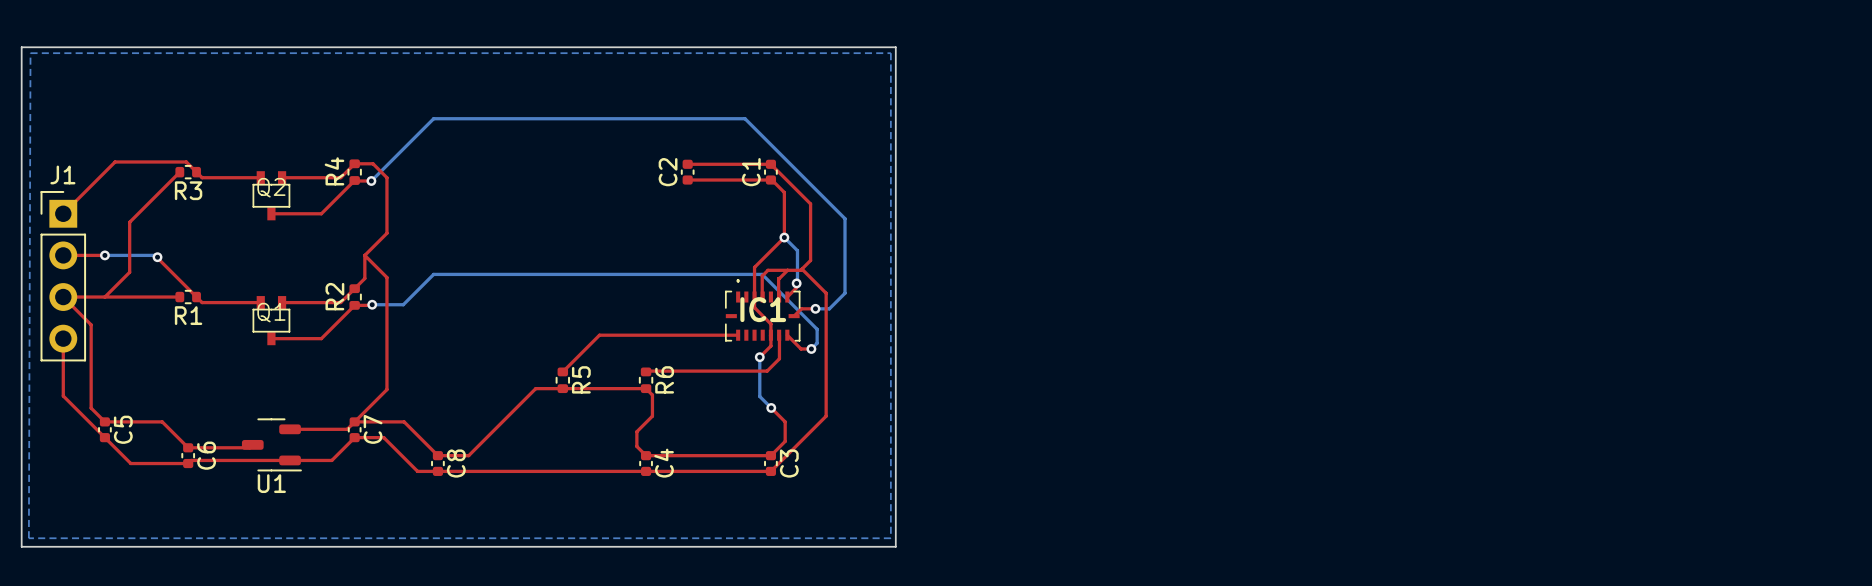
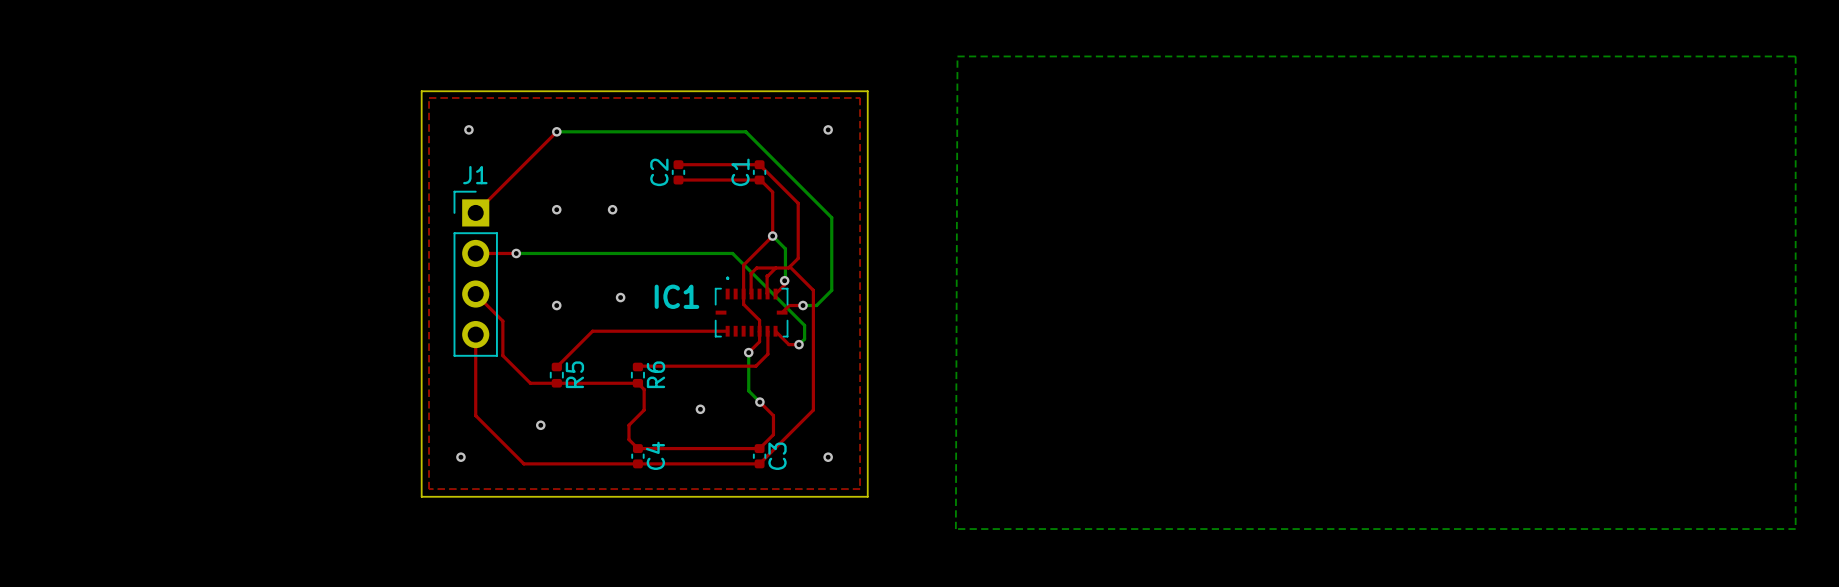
board edge: (21, 47) (21, 546) (895, 546) (895, 47) (21, 47) -> none
bottom zone outline: (30, 53) (28, 538) (890, 538) (890, 53) (30, 53) -> none
bottom zone outline: none -> (957, 56) (955, 529) (1795, 529) (1795, 56) (957, 56)
board edge: none -> (421, 91) (421, 496) (867, 496) (867, 91) (421, 91)
top zone outline: none -> (429, 97) (429, 489) (860, 489) (860, 97) (429, 97)
via: none -> (468, 129)
via: none -> (828, 129)
top track: none -> (556, 131) (475, 212)
via: none -> (556, 131)
bottom track: (756, 130) (745, 118) (433, 118) (371, 181) -> (745, 131) (556, 131)
top track: (179, 172) (129, 222) (129, 272) (104, 297) -> none
R3: (188, 172) -> none
R4: (354, 172) -> none
top track: (260, 177) (202, 177) (186, 161) (115, 161) (63, 213) -> none
top track: (282, 177) (340, 177) (354, 163) (373, 163) (386, 177) (386, 233) (364, 255) -> none
top track: (371, 181) (354, 180) (321, 213) (271, 213) -> none
via: (371, 181) -> none
Q2: (271, 195) -> none
via: none -> (556, 209)
via: none -> (612, 209)
top track: (63, 255) (104, 255) -> none
bottom track: (104, 255) (155, 255) (157, 257) -> none
via: (104, 255) -> none
top track: (364, 255) (386, 277) (386, 389) (347, 429) (290, 429) -> none
top track: (364, 255) (364, 278) (340, 302) (282, 302) -> none
top track: none -> (475, 253) (516, 253)
via: none -> (516, 253)
top track: (157, 257) (202, 302) (260, 302) -> none
via: (157, 257) -> none
bottom track: (762, 274) (433, 274) (403, 304) (372, 304) -> (751, 271) (732, 253) (516, 253)
J1 position: (63, 276) -> (475, 273)
top track: (179, 297) (63, 297) (91, 324) (91, 408) (104, 421) (162, 421) (188, 447) (249, 447) (252, 444) -> none
R1: (188, 297) -> none
R2: (354, 297) -> none
via: none -> (620, 297)
top track: (372, 304) (354, 305) (321, 338) (271, 338) -> none
via: (372, 304) -> none
via: none -> (556, 305)
IC1 name position: IC1 (763, 309) -> IC1 (676, 296)
Q1: (271, 320) -> none
top track: (63, 338) (63, 396) (130, 463) (188, 463) (191, 460) (331, 460) (354, 437) (383, 437) (417, 471) (529, 471) -> (475, 334) (475, 415) (523, 463)
top track: (535, 388) (468, 455) (437, 455) (404, 421) (354, 421) -> (530, 383) (502, 355) (502, 321) (475, 294)
via: none -> (700, 409)
C5: (104, 429) -> none
C7: (354, 429) -> none
via: none -> (540, 425)
U1: (271, 444) -> none
C6: (188, 455) -> none
C8: (437, 463) -> none
via: none -> (460, 457)
via: none -> (828, 457)

